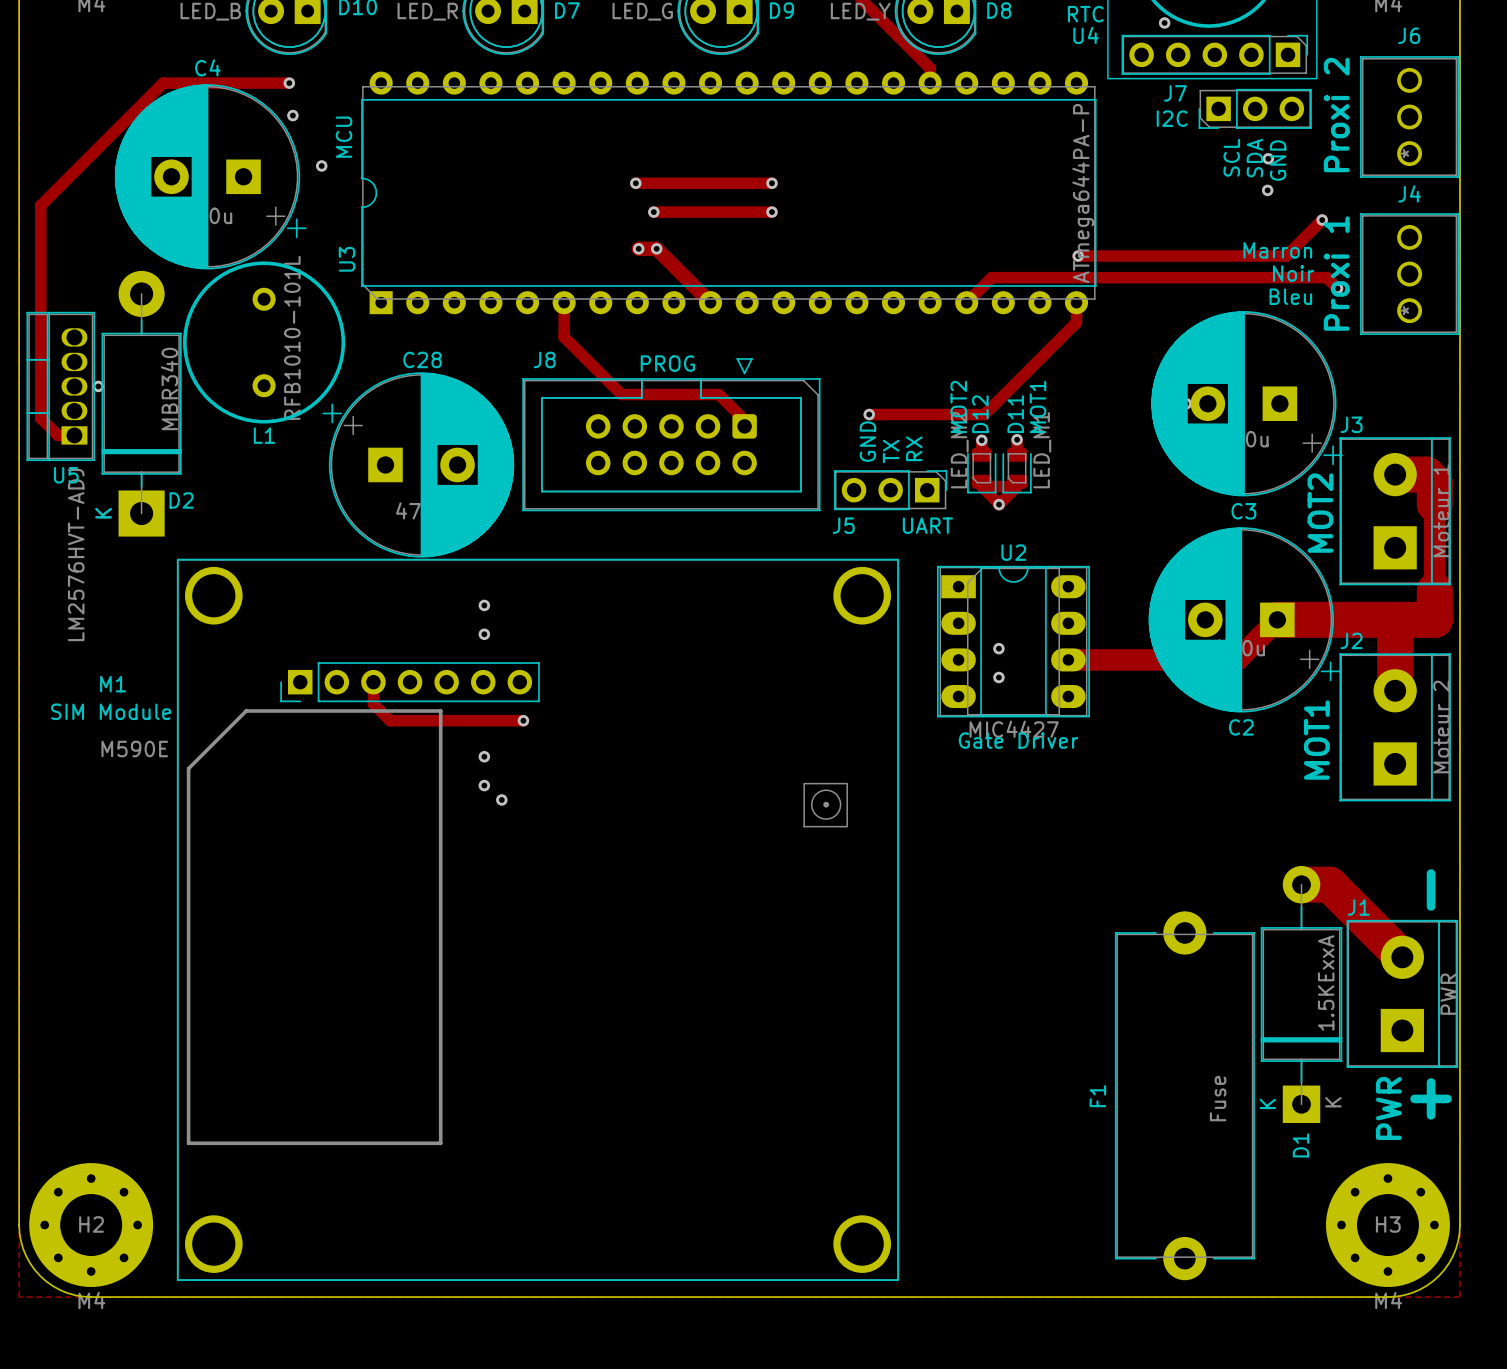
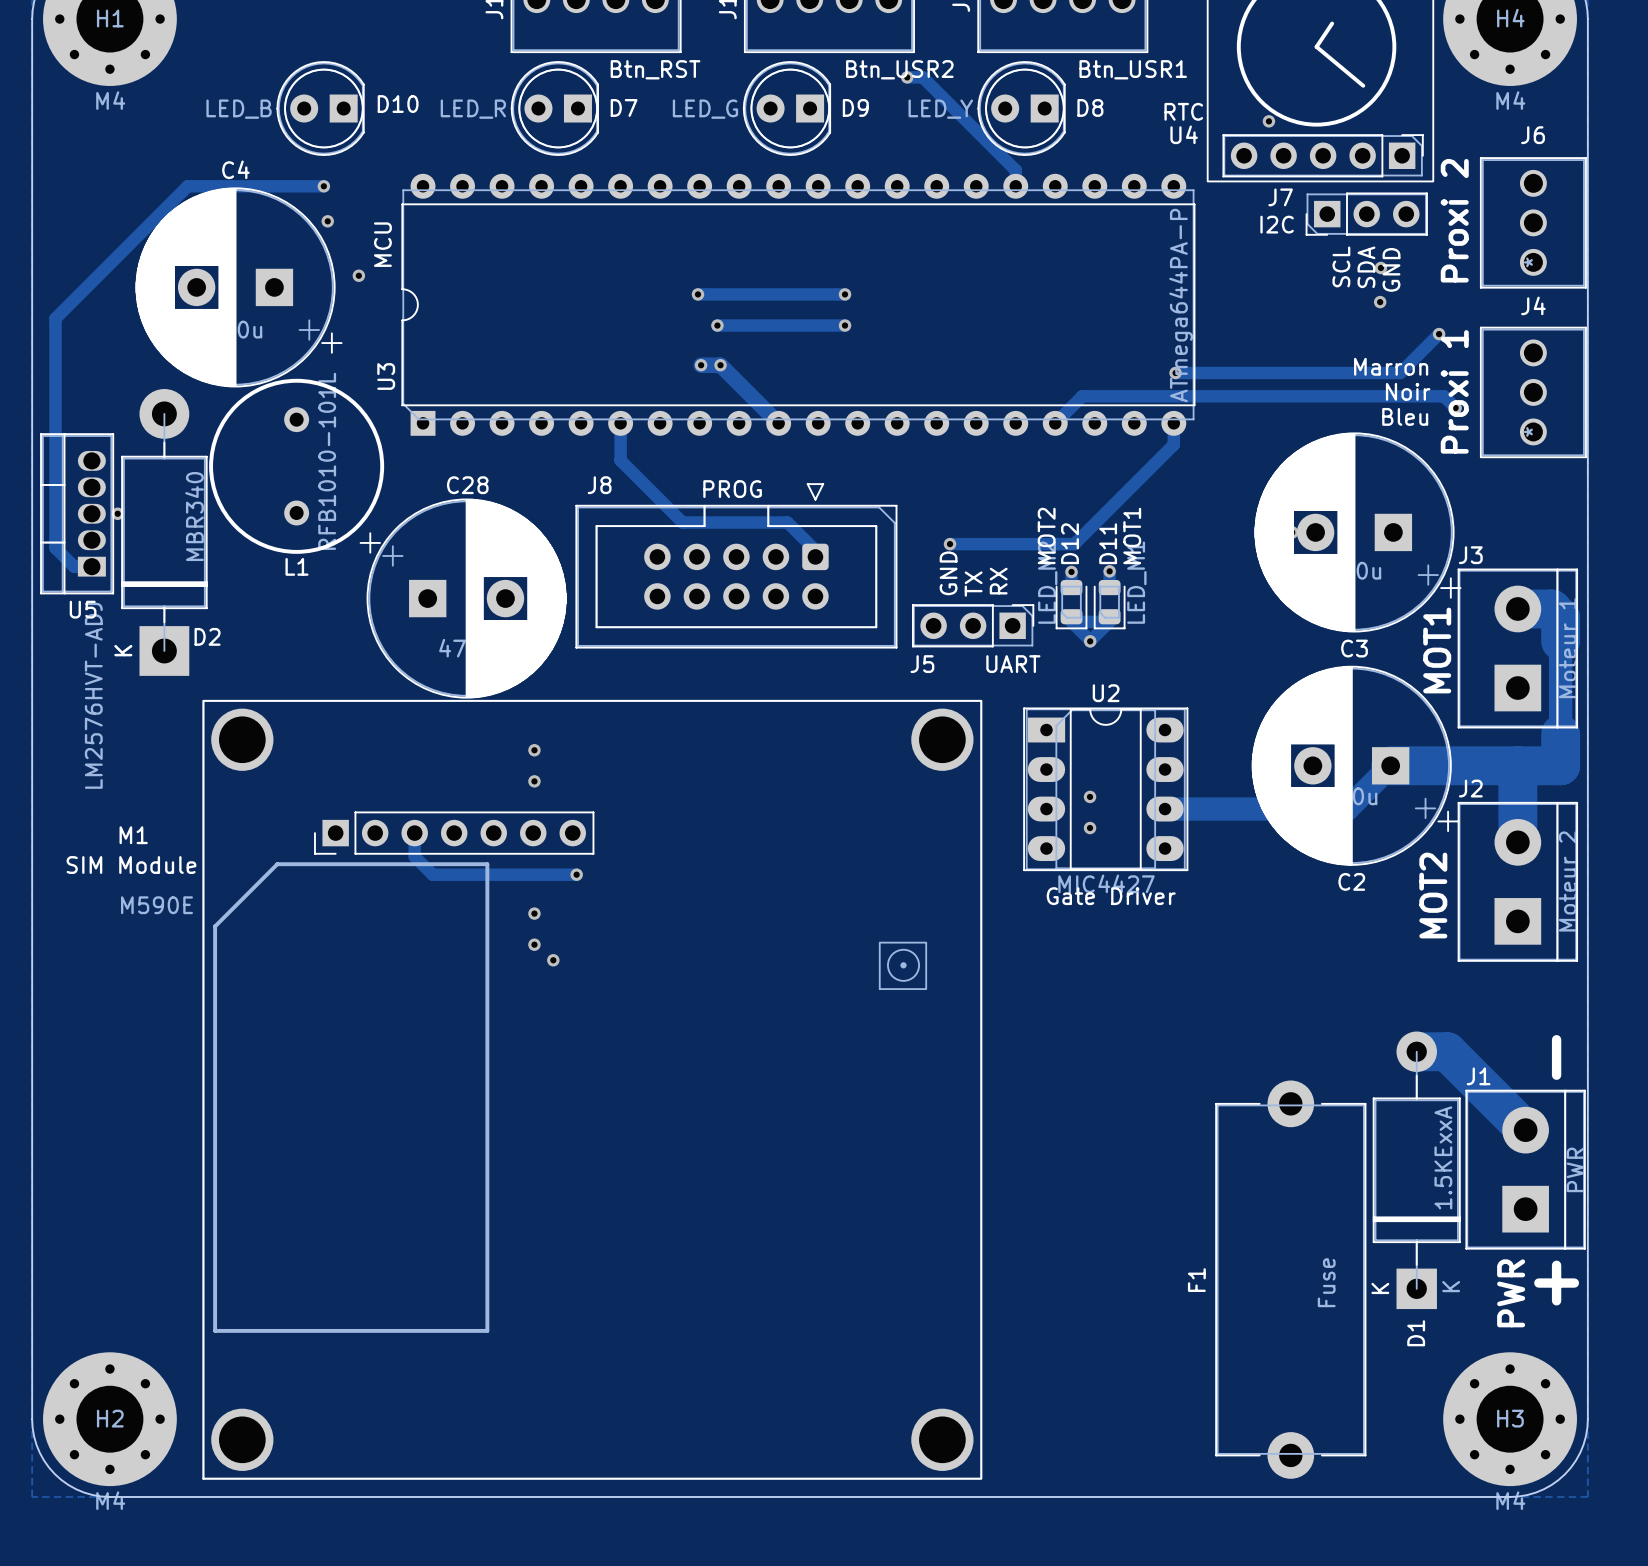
text: MOT2 (1320, 513) -> MOT1 (1437, 650)
text: MOT1 (1316, 740) -> MOT2 (1433, 895)

